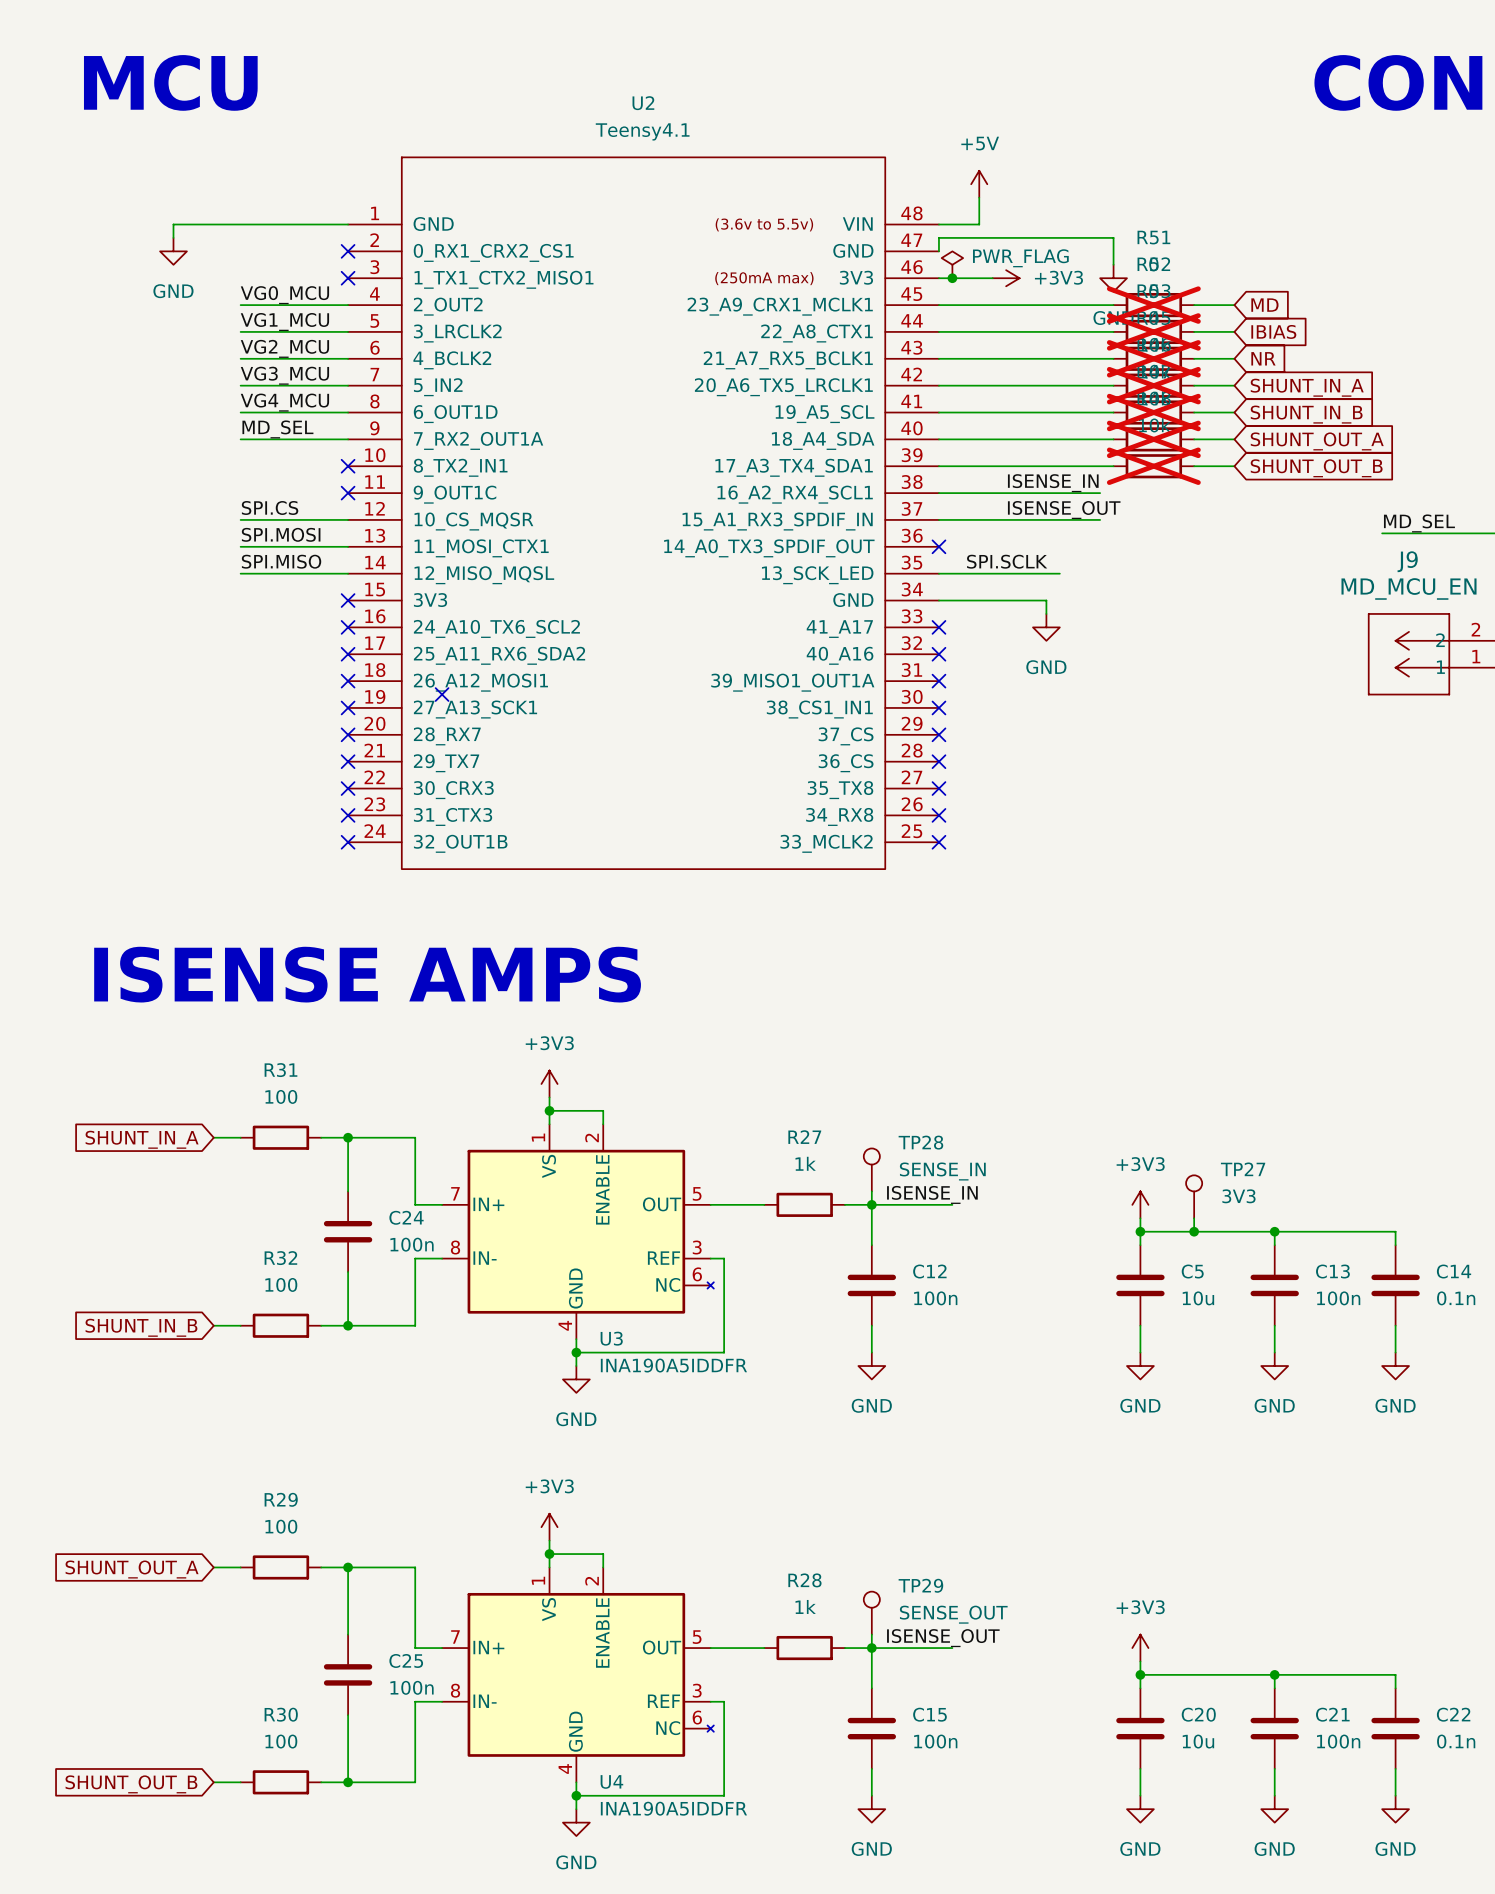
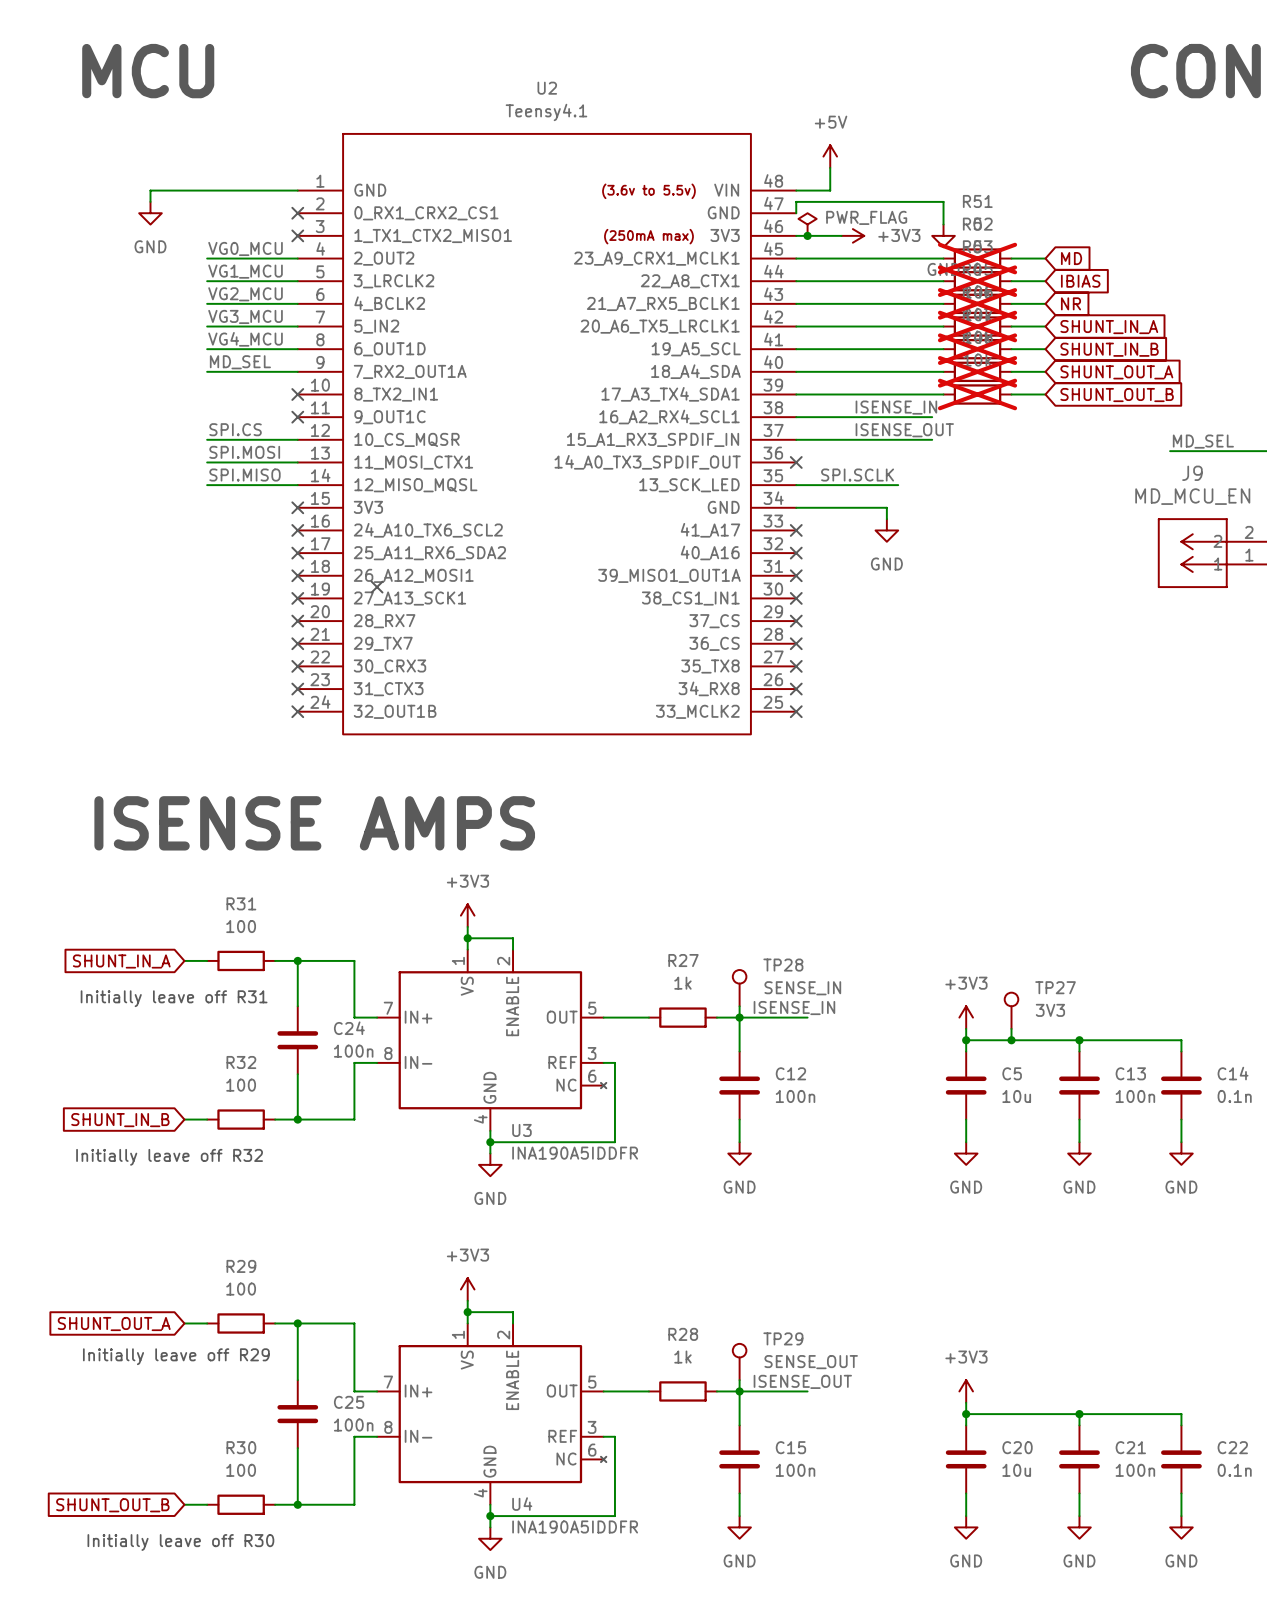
text: none -> Initially leave off R31 (174, 998)
text: none -> Initially leave off R32 (169, 1157)
text: none -> Initially leave off R29 (176, 1356)
text: none -> Initially leave off R30 (180, 1542)

